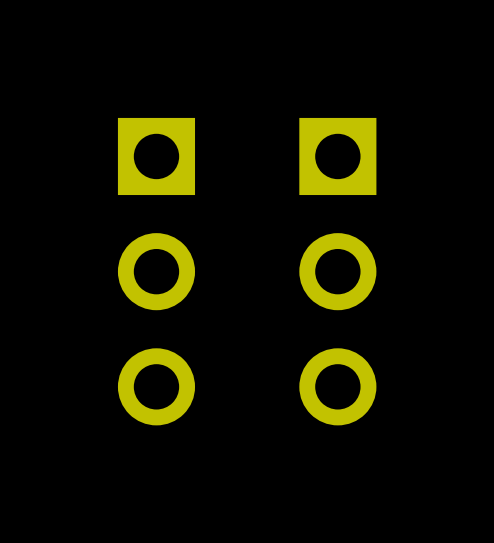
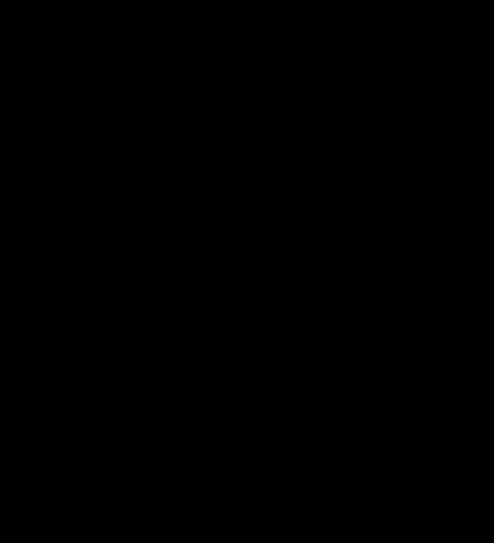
part: (156, 271) -> none
part: (337, 271) -> none

